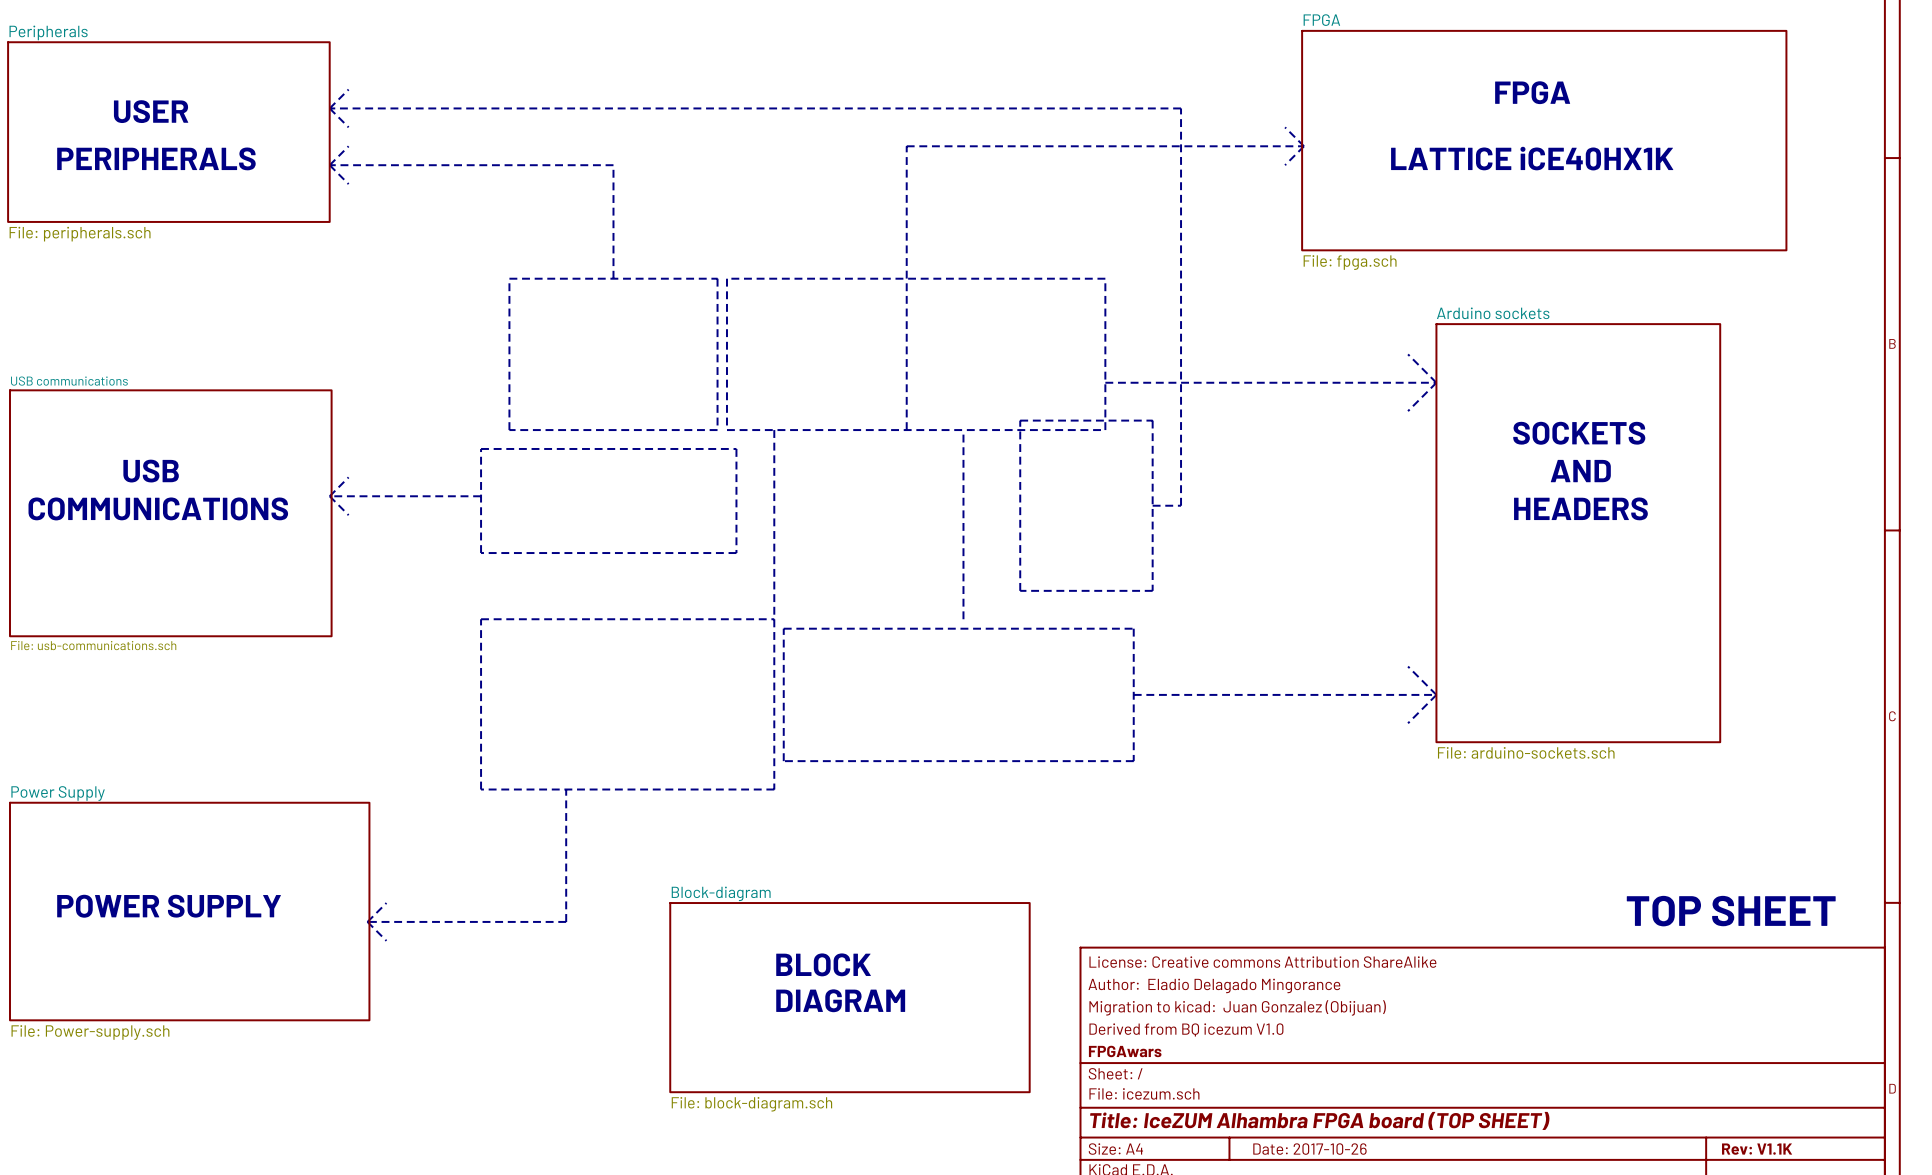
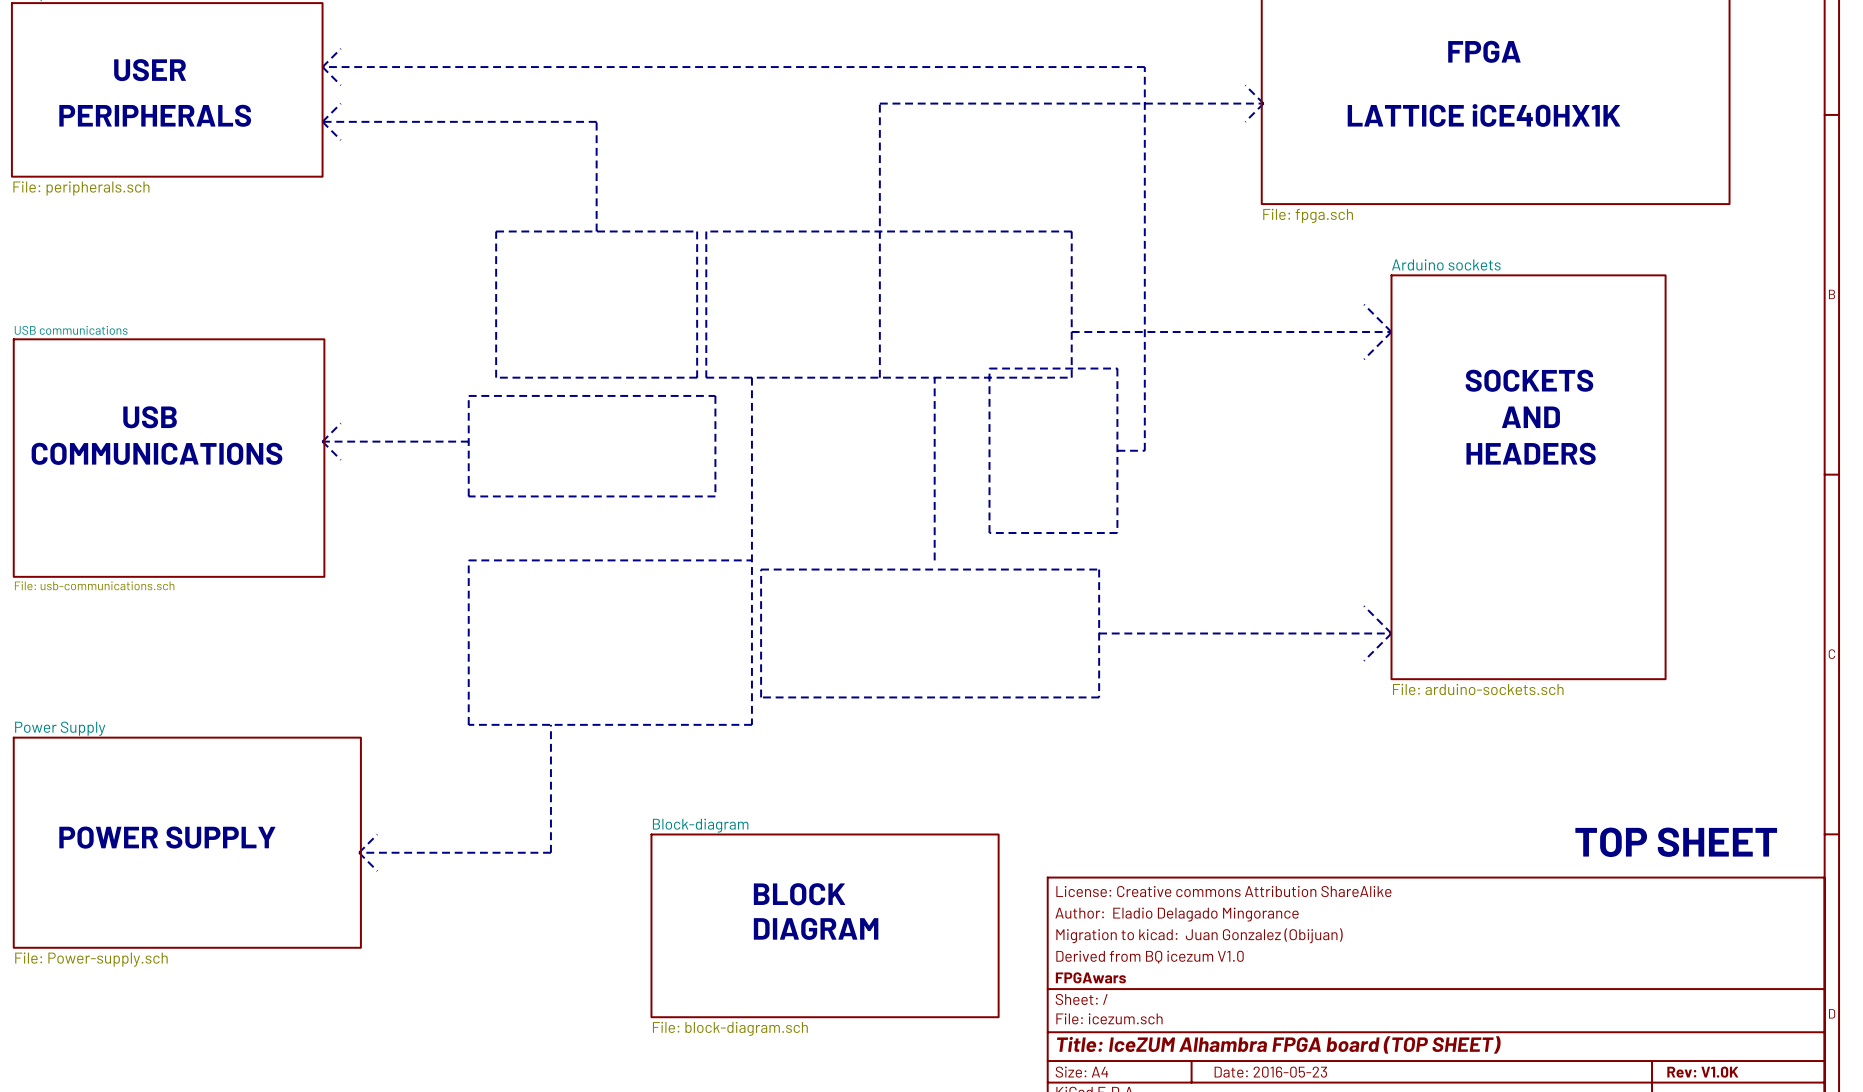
title block: Date: 2017-10-26 (1309, 1149) -> Date: 2016-05-23 (1270, 1072)
title block: Rev: V1.1K (1757, 1149) -> Rev: V1.0K (1702, 1072)

